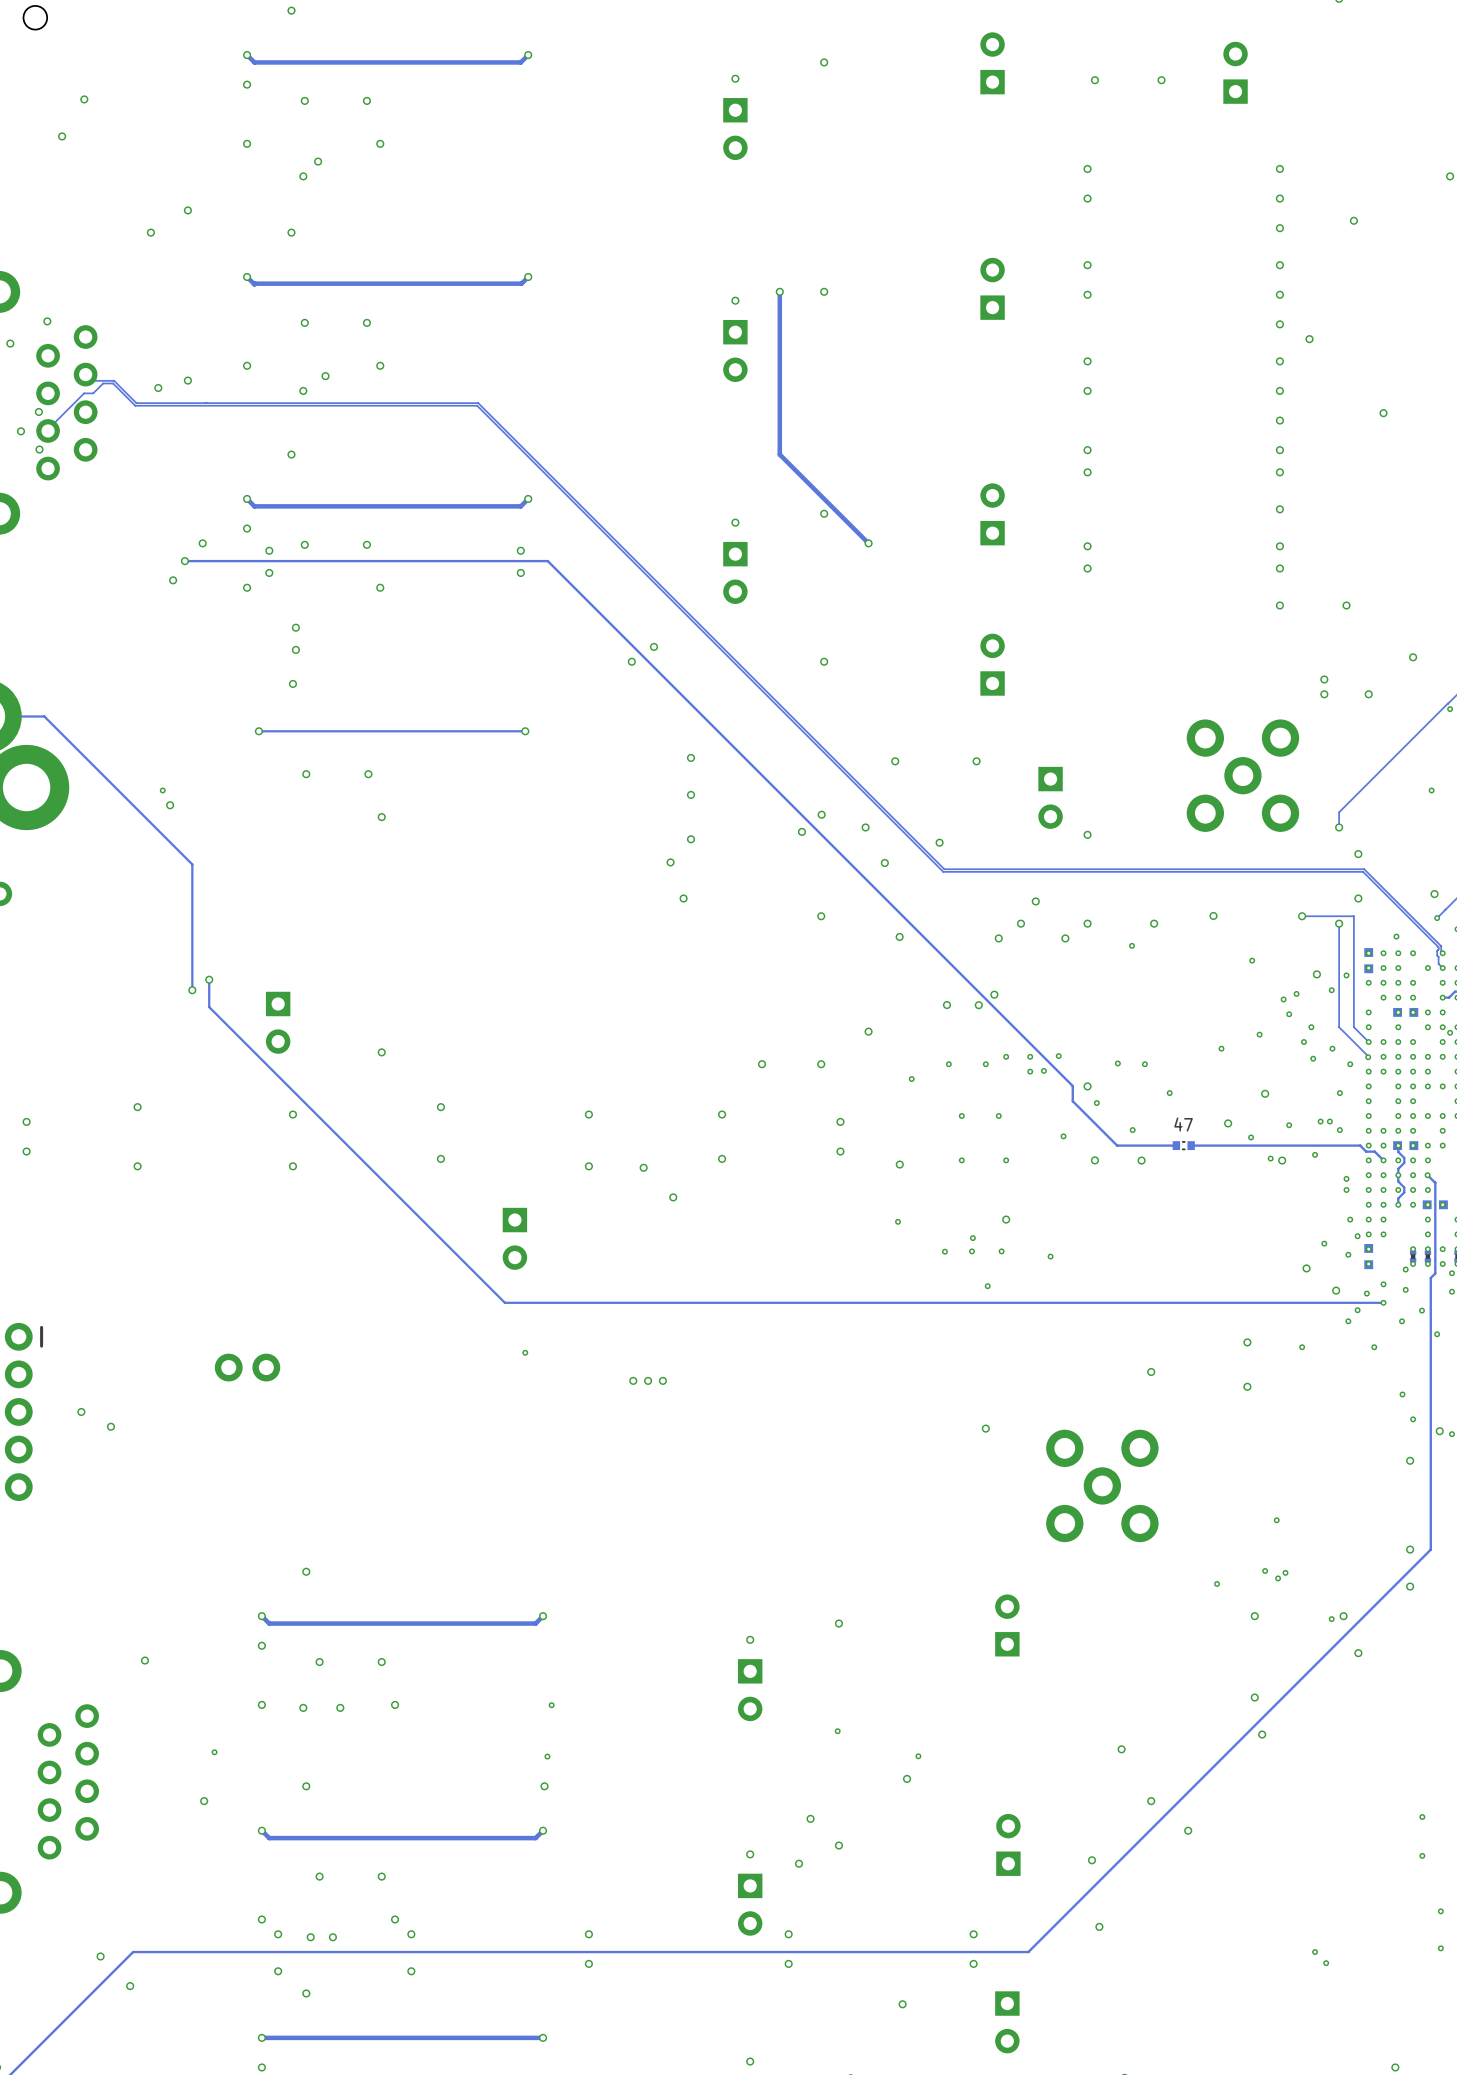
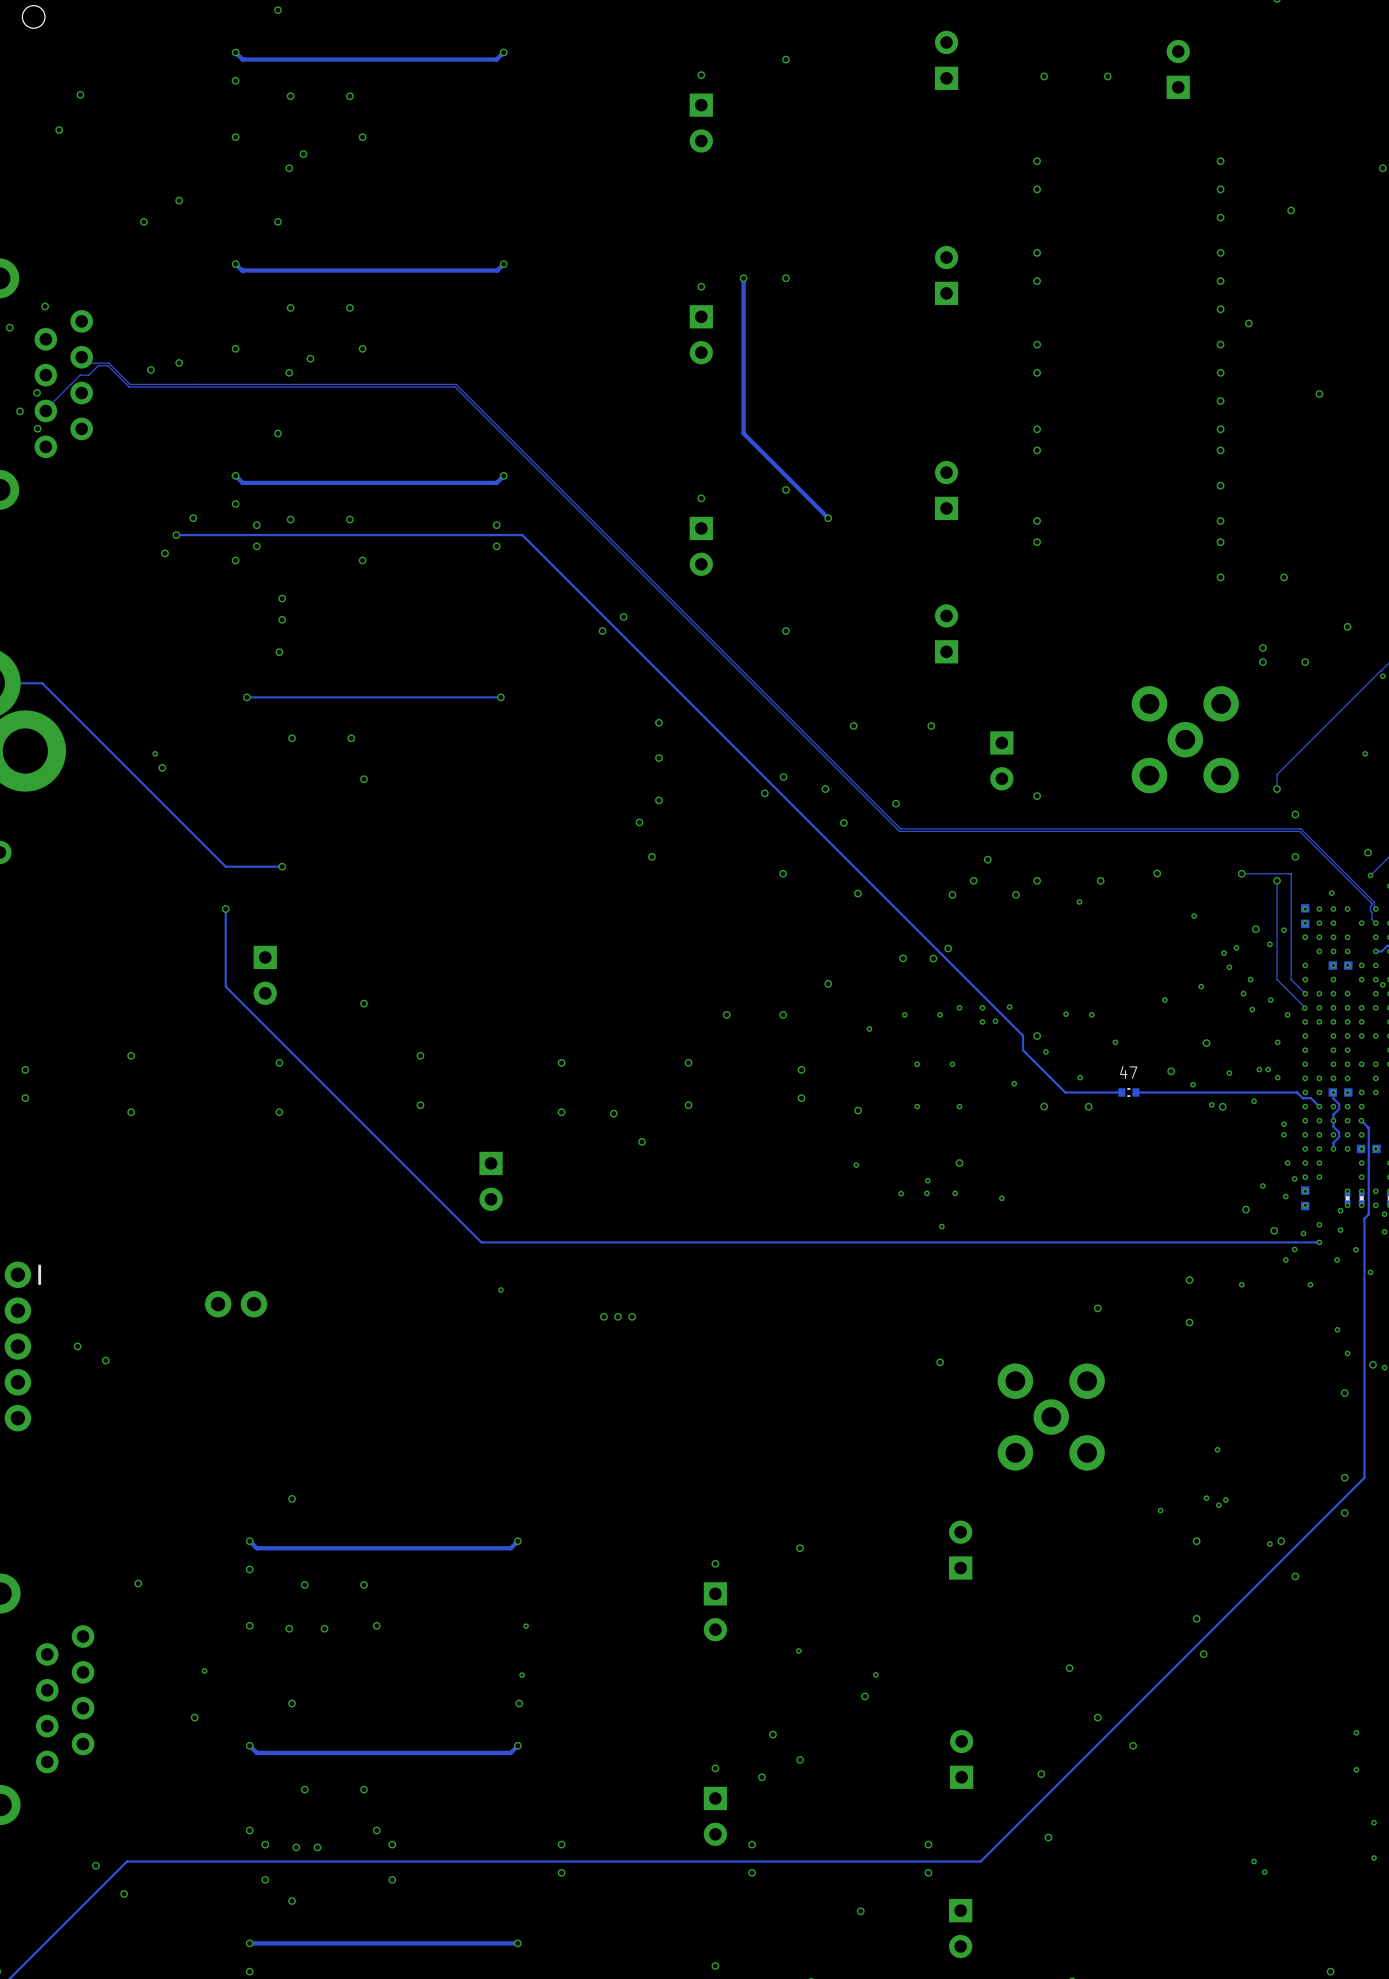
track: (192, 864) (192, 990) -> (183, 824) (225, 866) (282, 866)
via: none -> (282, 866)
via: none -> (225, 909)
track: (209, 979) (209, 1007) (236, 1034) -> (225, 909) (225, 986)
via: (209, 979) -> none
via: (192, 990) -> none

